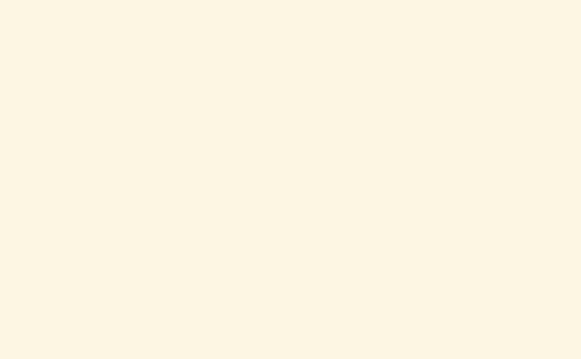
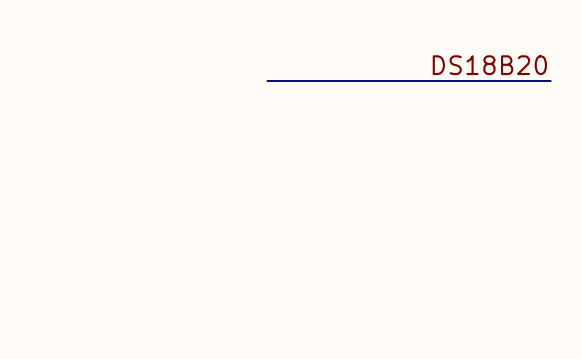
label: none -> DS18B20 (489, 65)
wire: none -> (267, 80) (550, 80)

